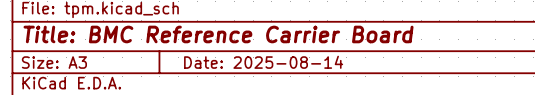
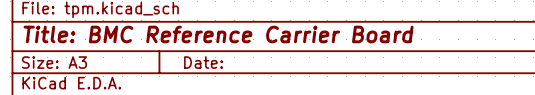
title block: Date: 2025-08-14 (263, 62) -> Date: (203, 62)

